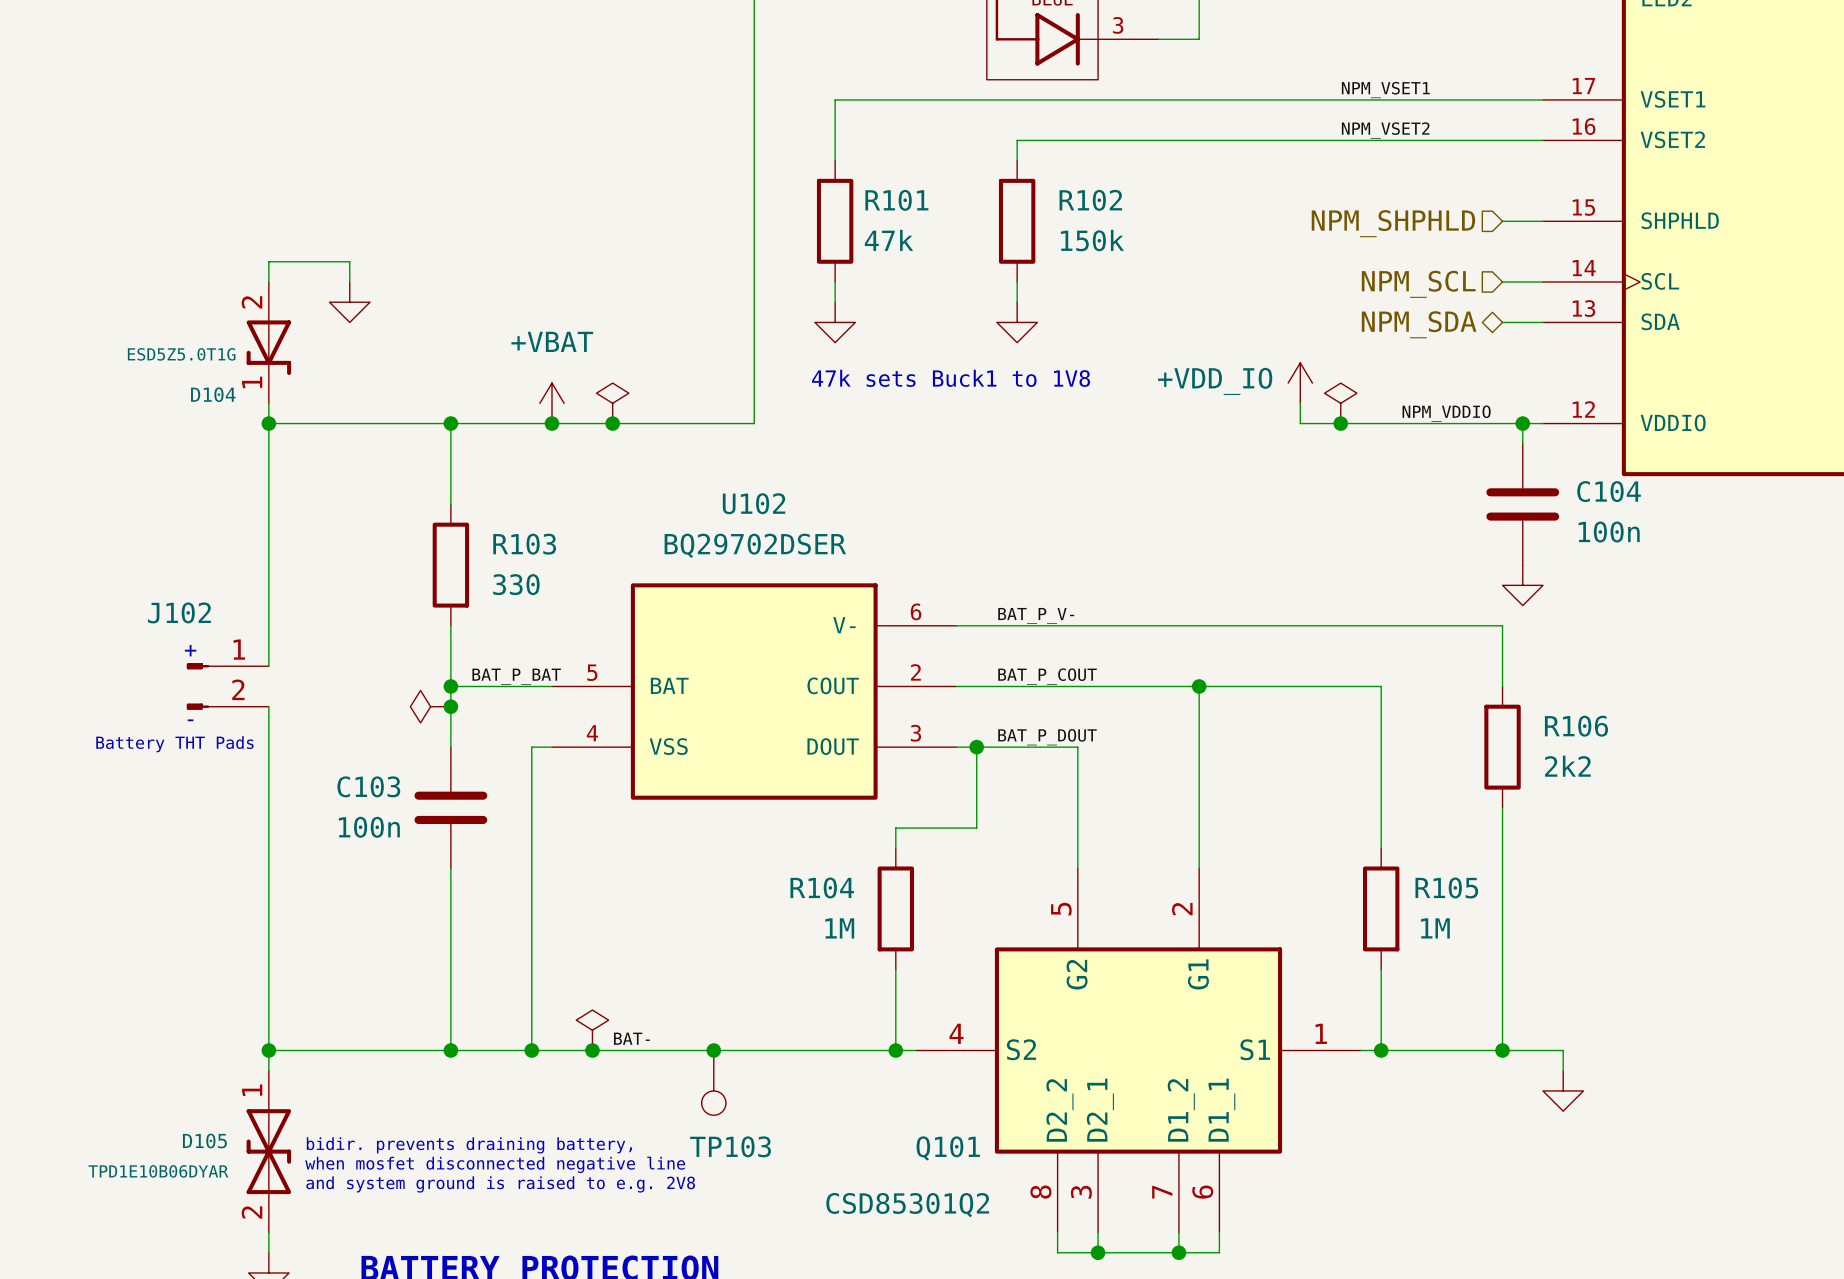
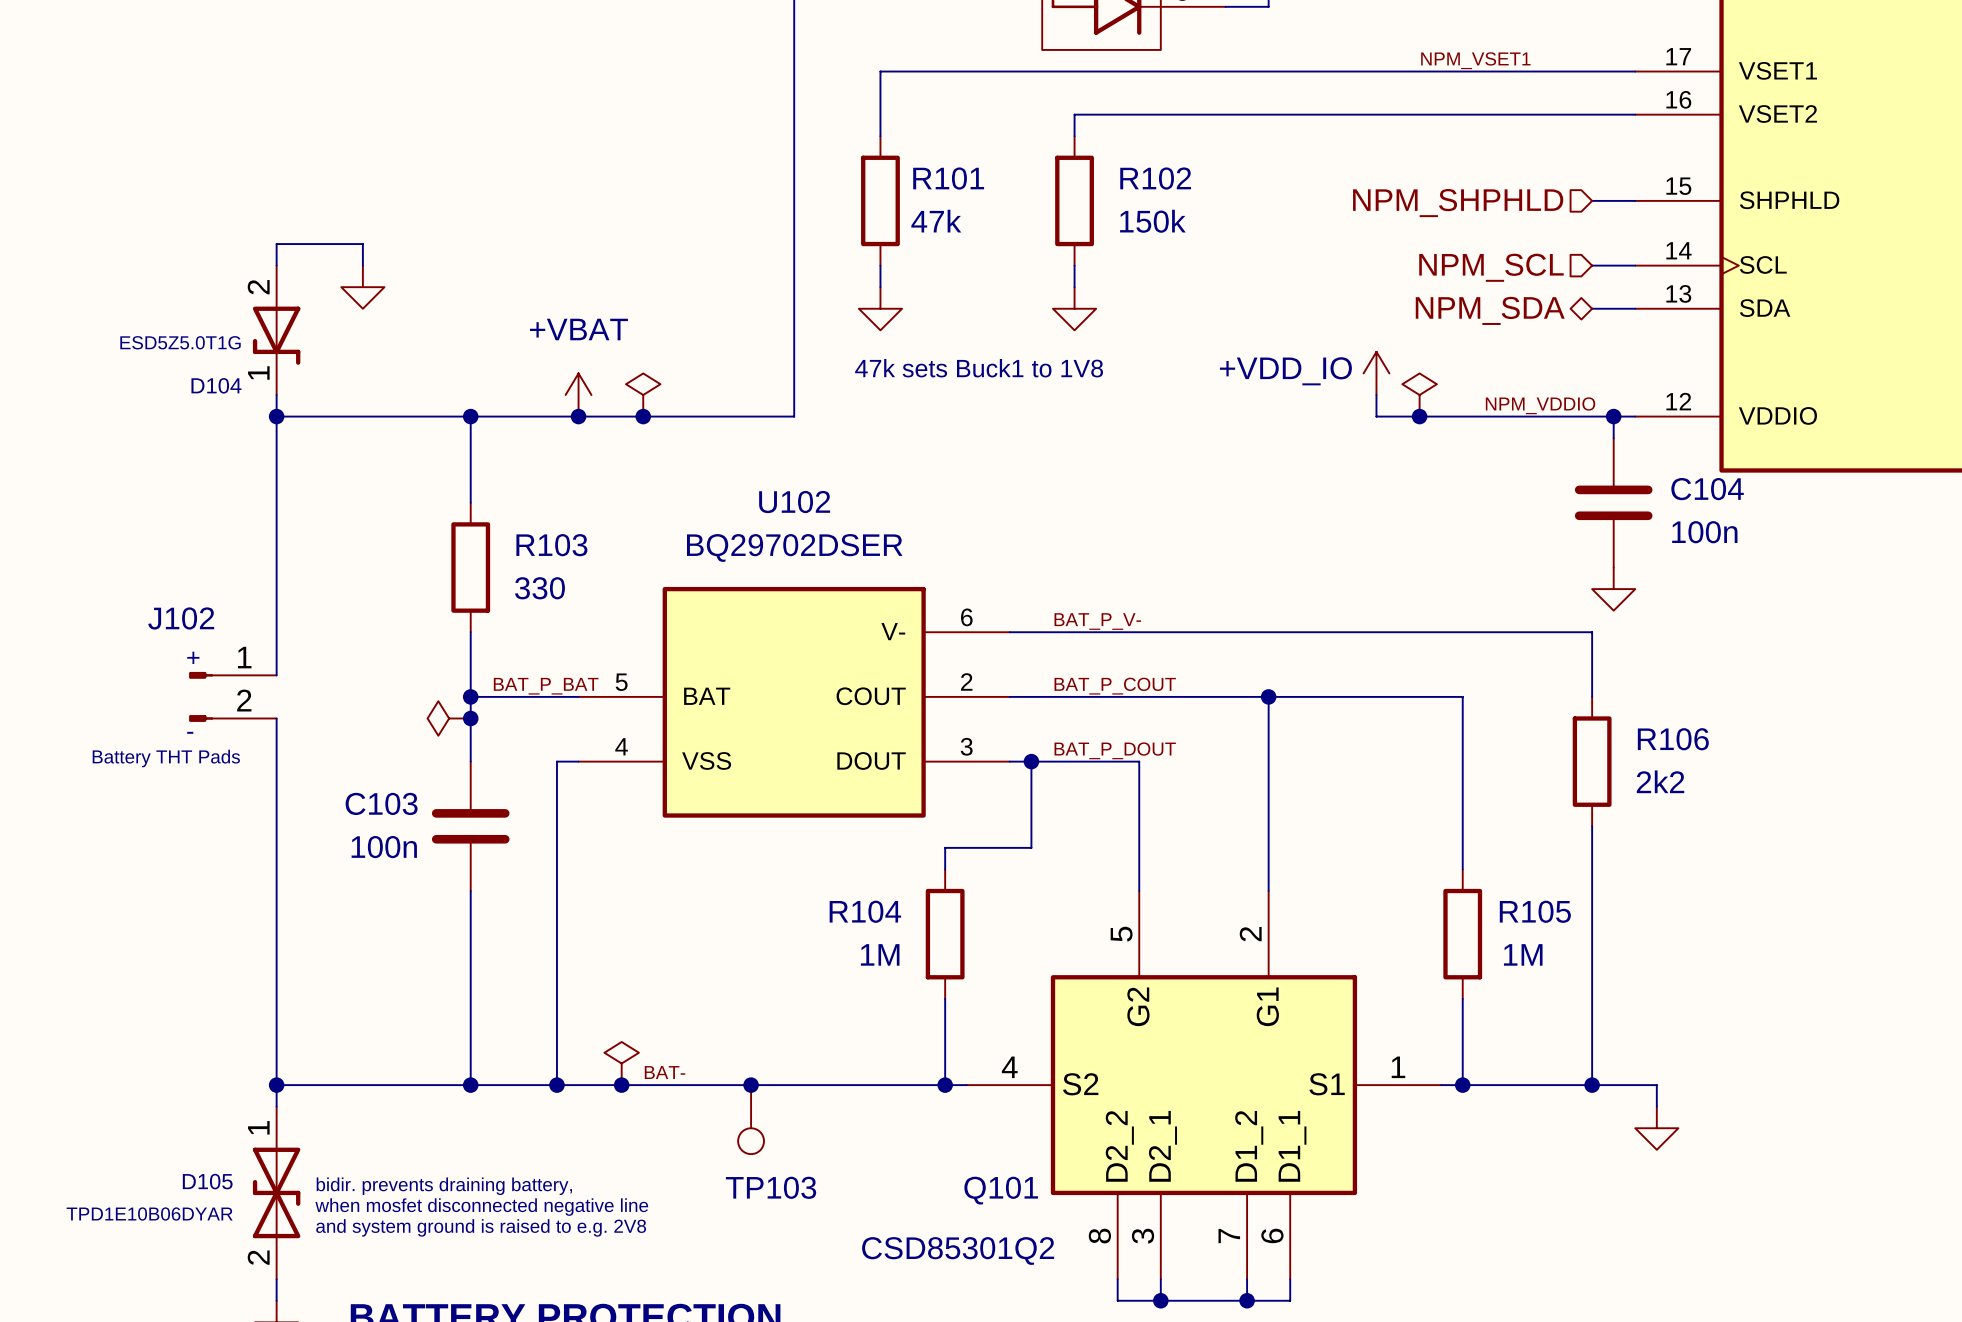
label: NPM_VSET2 (1385, 130) -> none

